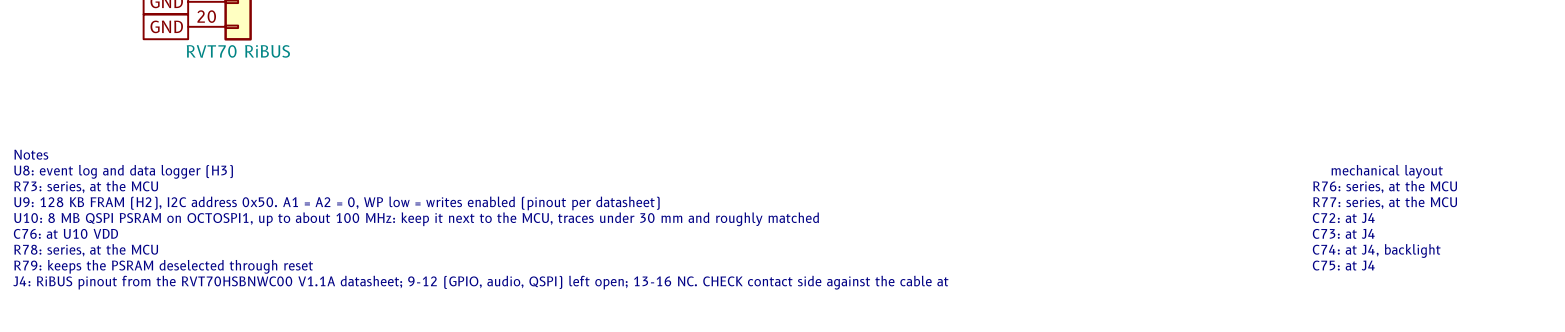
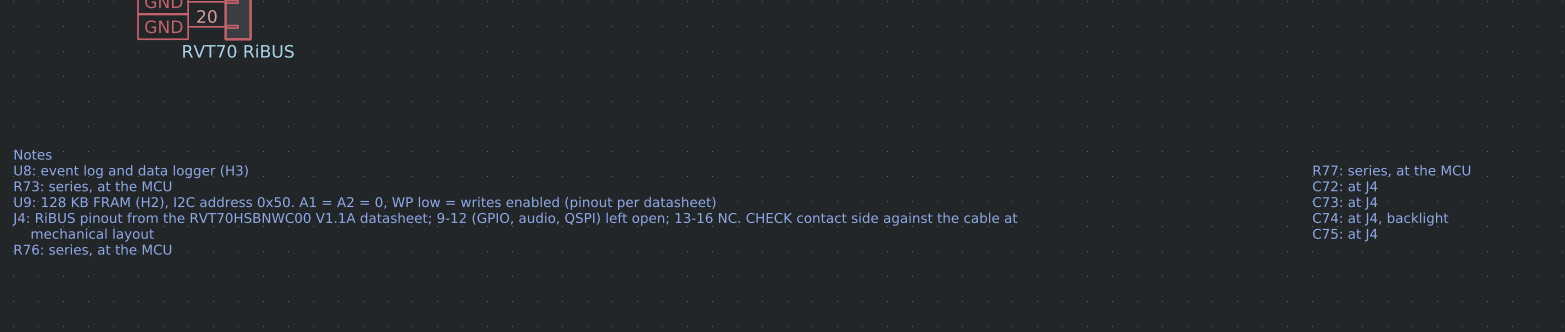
text: mechanical layout (1387, 171) -> R77: series, at the MCU (1391, 171)
text: R76: series, at the MCU (1385, 186) -> C72: at J4 (1345, 187)
text: R77: series, at the MCU (1385, 202) -> C73: at J4 (1345, 203)
text: C72: at J4 (1343, 218) -> C74: at J4, backlight (1380, 219)
text: U10: 8 MB QSPI PSRAM on OCTOSPI1, up to about 100 MHz: keep it next to the MCU, traces under 30 mm and roughly matched (416, 219) -> J4: RiBUS pinout from the RVT70HSBNWC00 V1.1A datasheet; 9-12 (GPIO, audio, QSPI) left open; 13-16 NC. CHECK contact side against the cable at (514, 219)
text: C76: at U10 VDD (65, 233) -> mechanical layout (92, 235)
text: C73: at J4 (1343, 233) -> C75: at J4 (1345, 235)
text: R78: series, at the MCU (86, 250) -> R76: series, at the MCU (92, 250)
text: C74: at J4, backlight (1376, 251) -> none
text: C75: at J4 (1343, 265) -> none
text: R79: keeps the PSRAM deselected through reset (163, 266) -> none
text: J4: RiBUS pinout from the RVT70HSBNWC00 V1.1A datasheet; 9-12 (GPIO, audio, QSPI) left open; 13-16 NC. CHECK contact side against the cable at (480, 282) -> none

